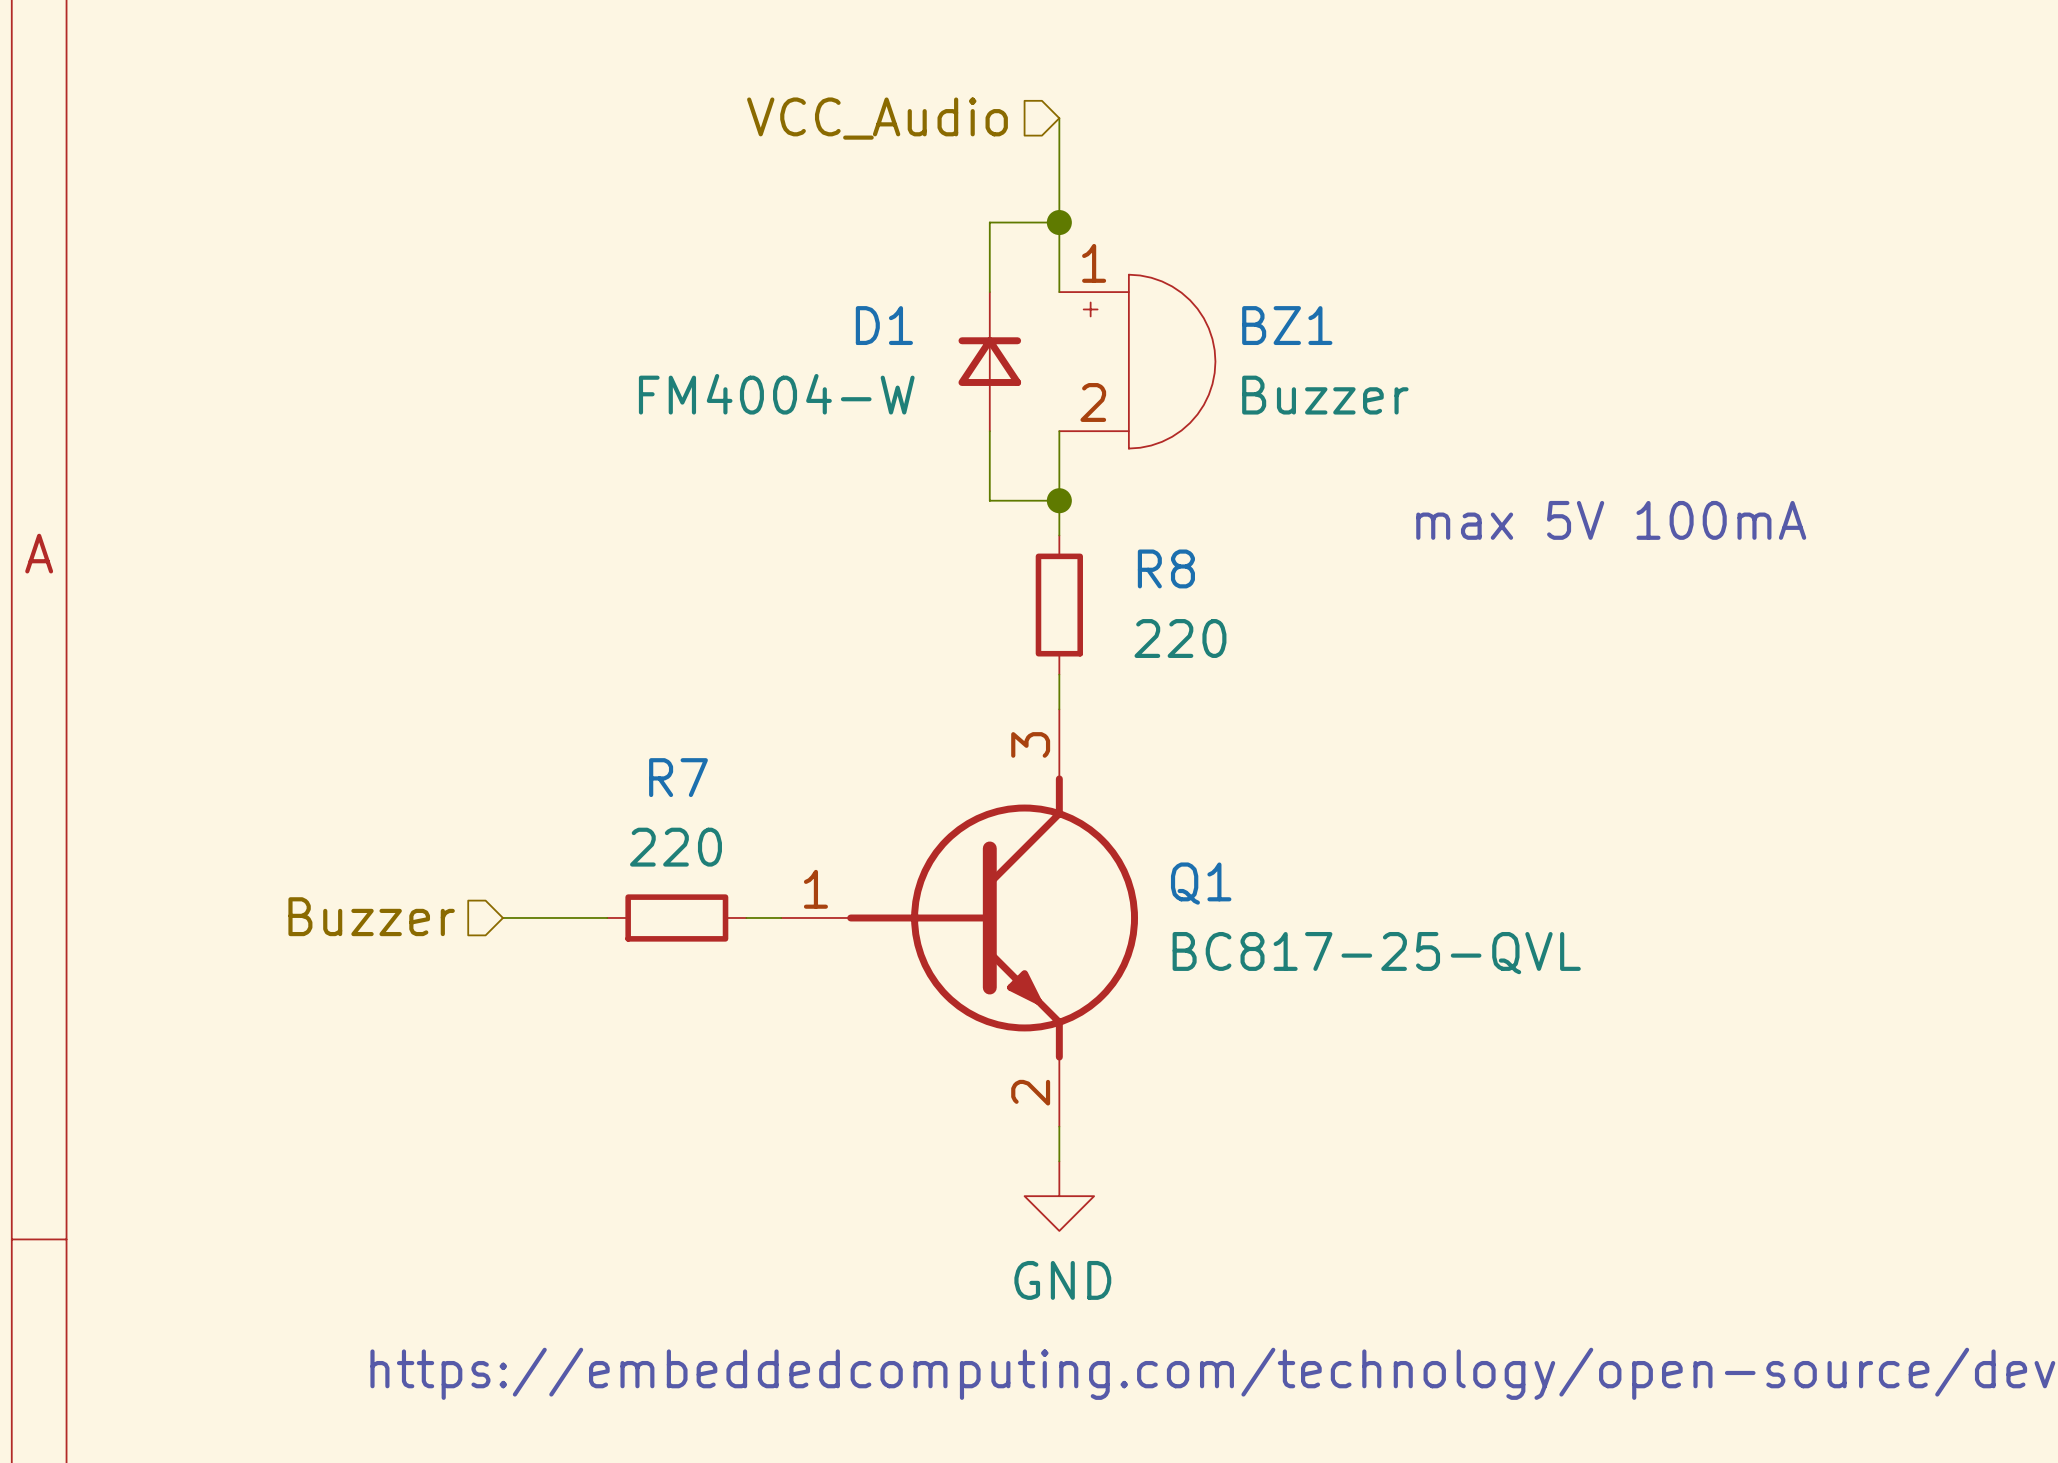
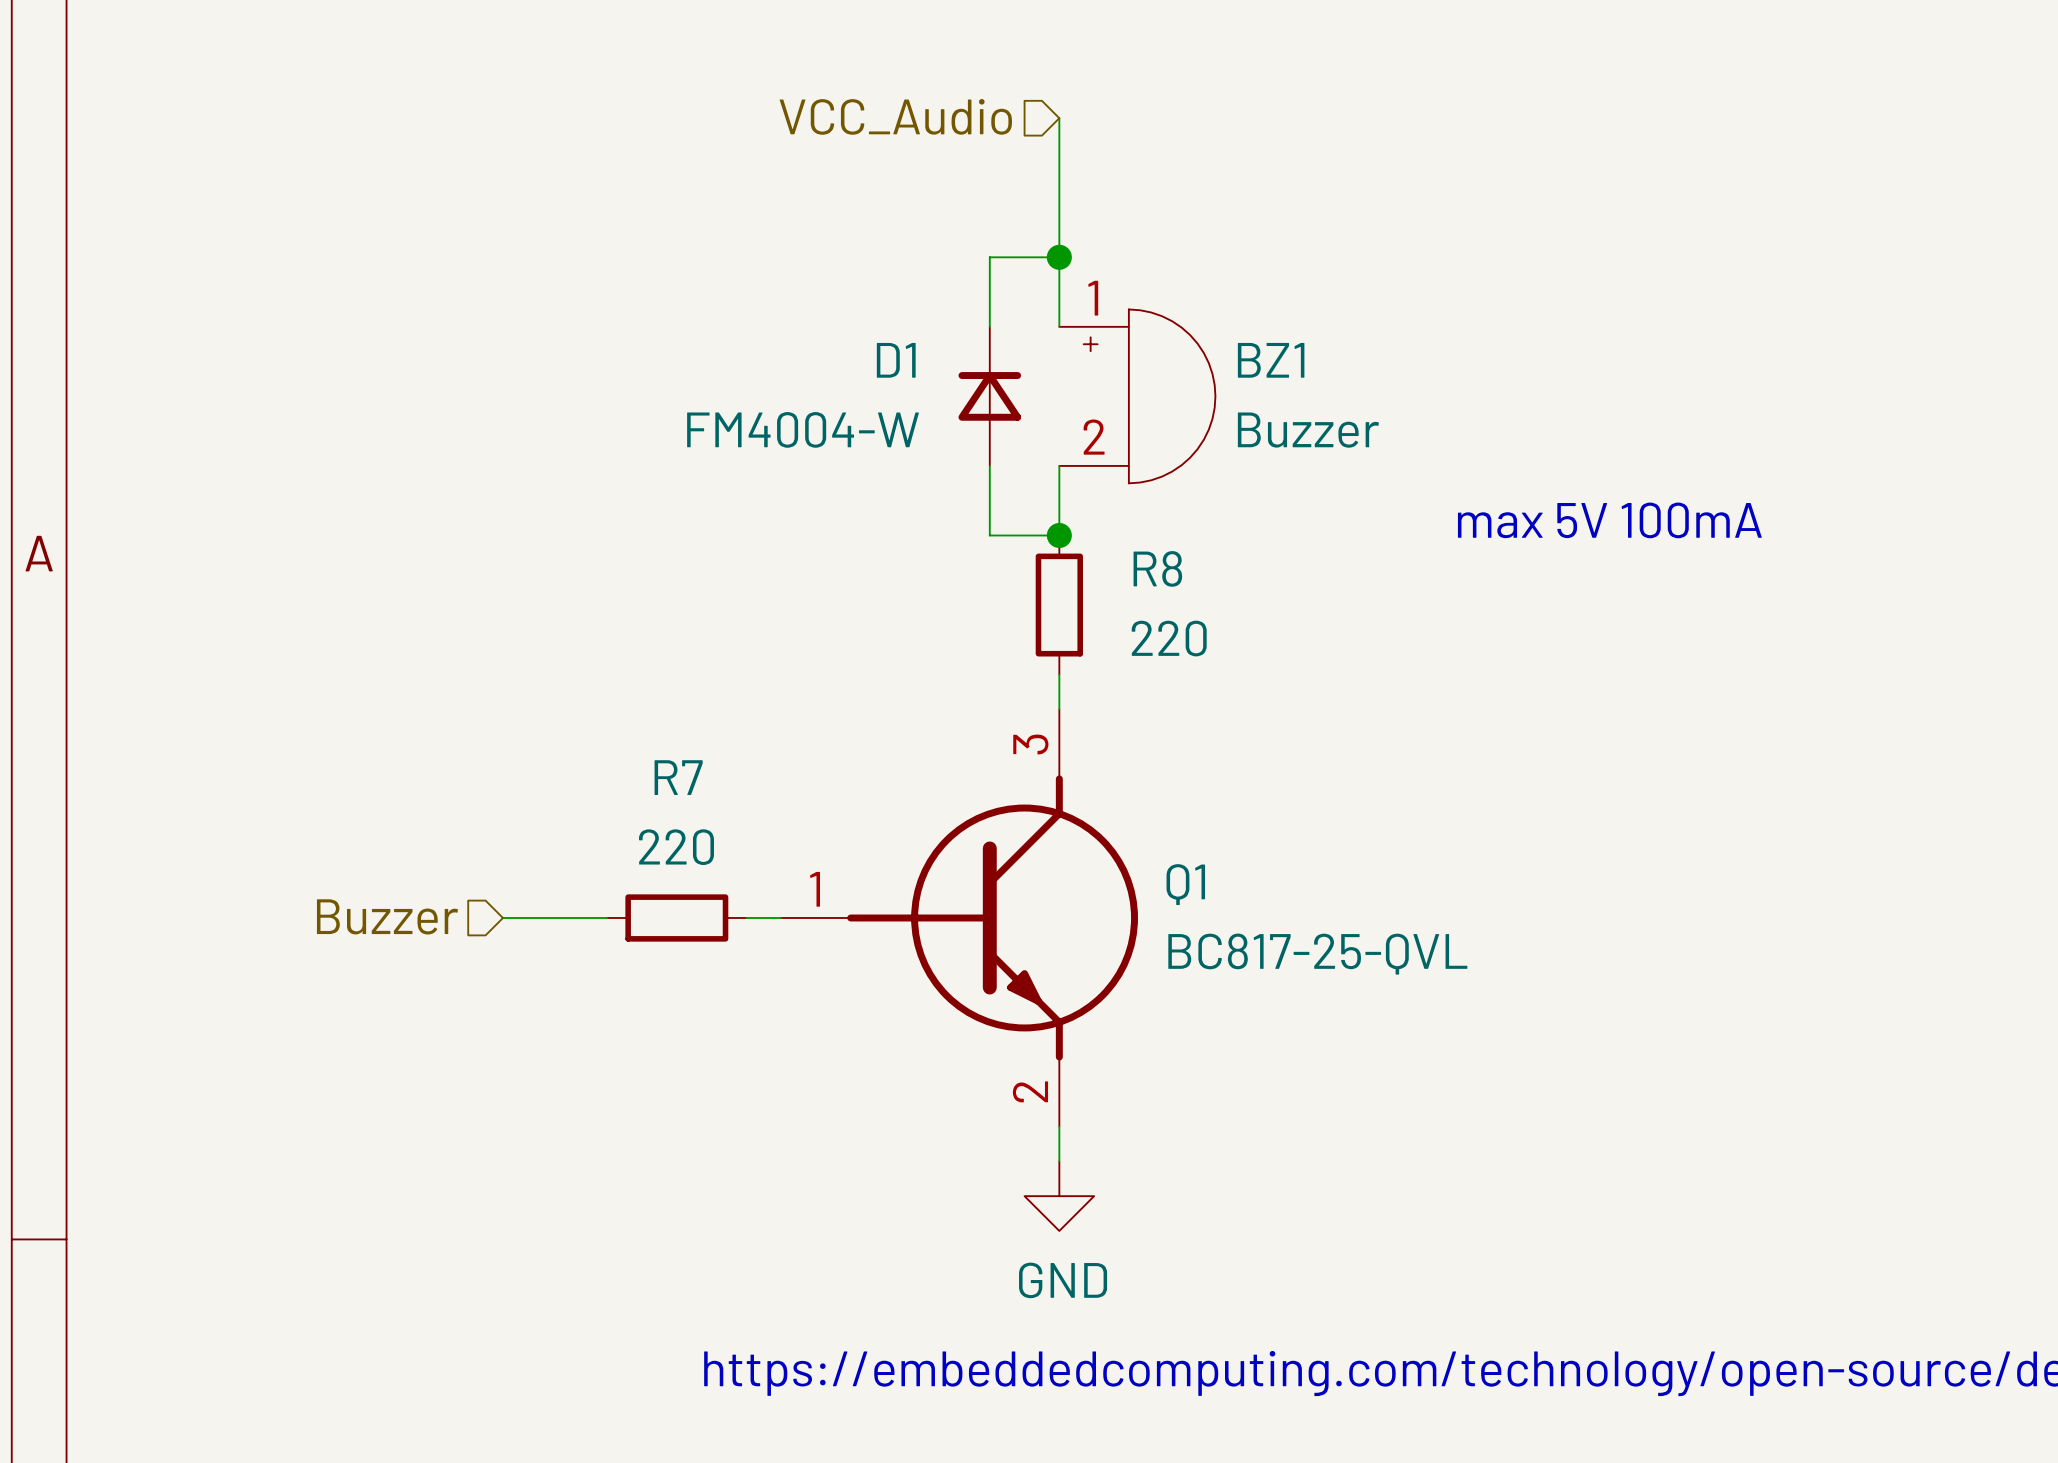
wire: (1059, 222) (989, 222) (989, 257) -> (1059, 257) (989, 257)
junction position: (1059, 222) -> (1059, 257)
D1 position: (989, 361) -> (989, 396)
BZ1 position: (1137, 361) -> (1137, 396)
wire: (1059, 431) (1059, 465) -> (1059, 292) (1059, 326)
wire: (989, 500) (1059, 500) -> (989, 500) (989, 535) (1059, 535)
junction position: (1059, 500) -> (1059, 535)

